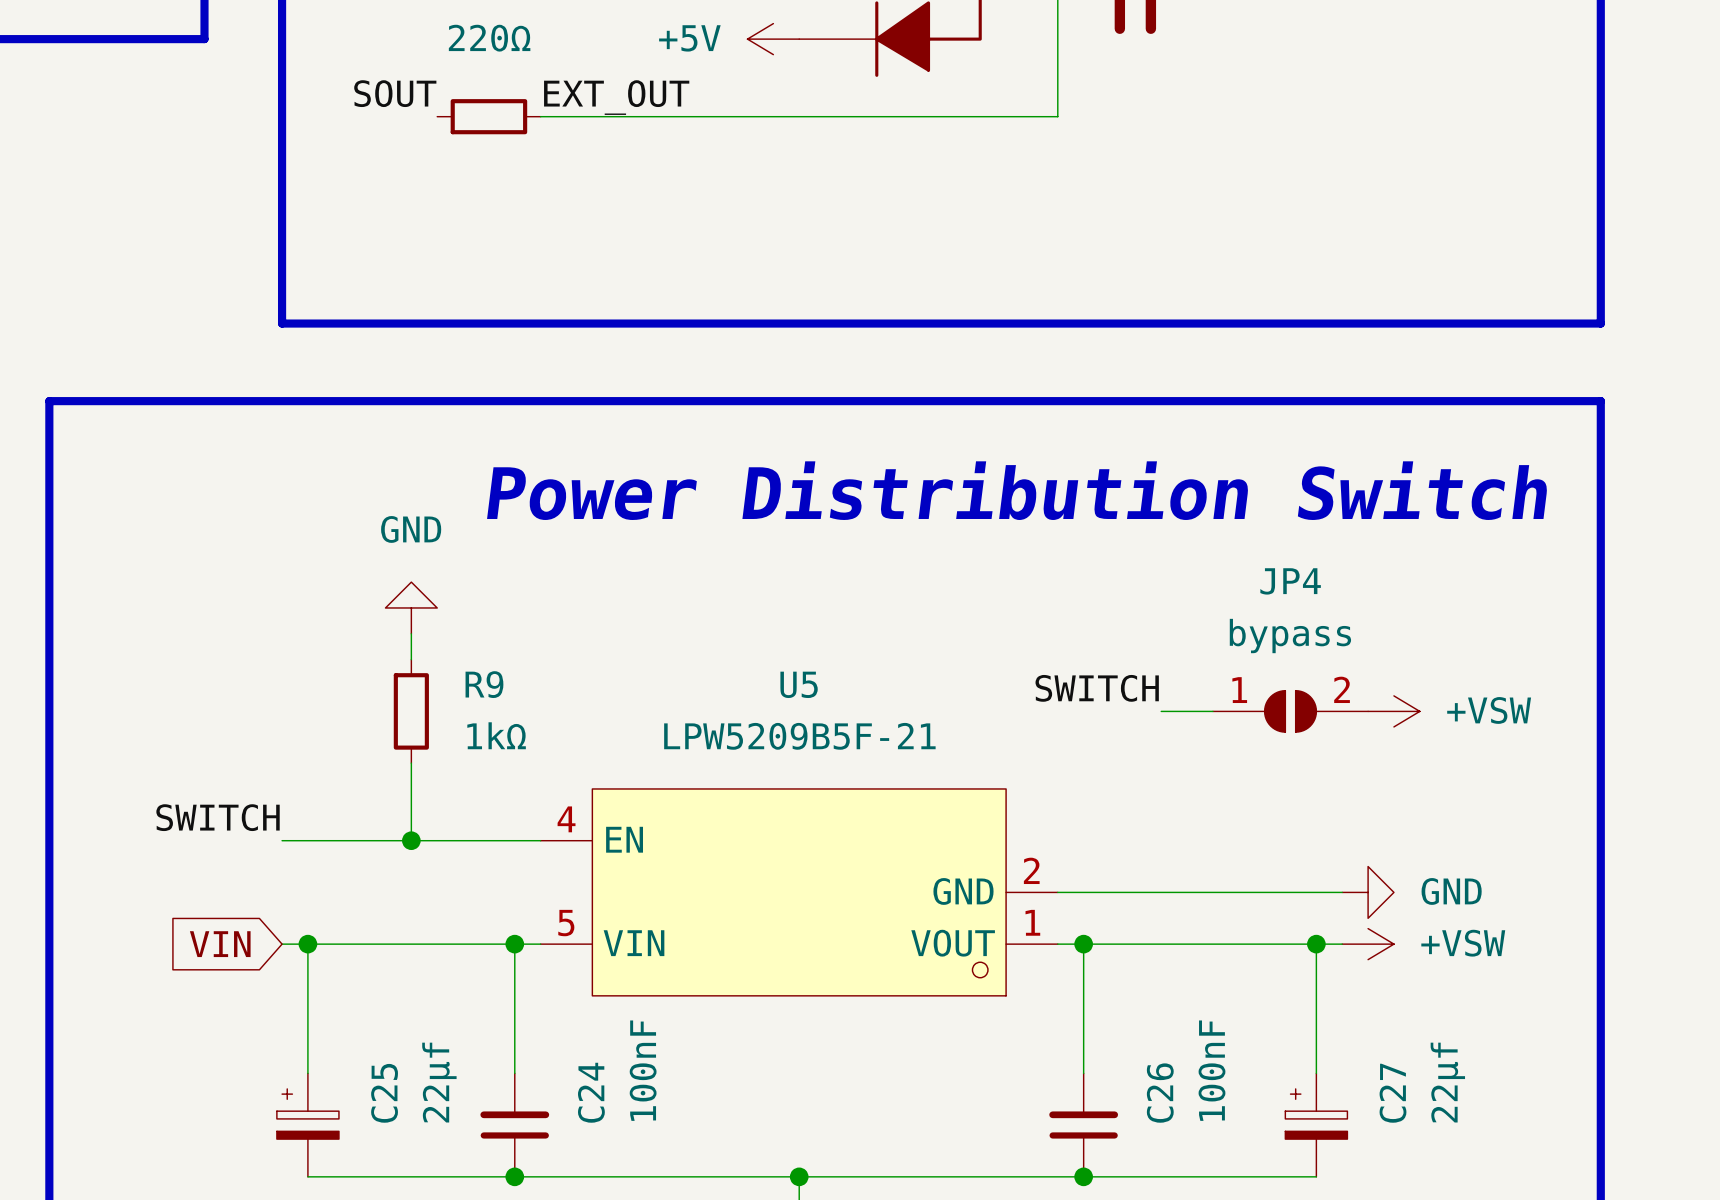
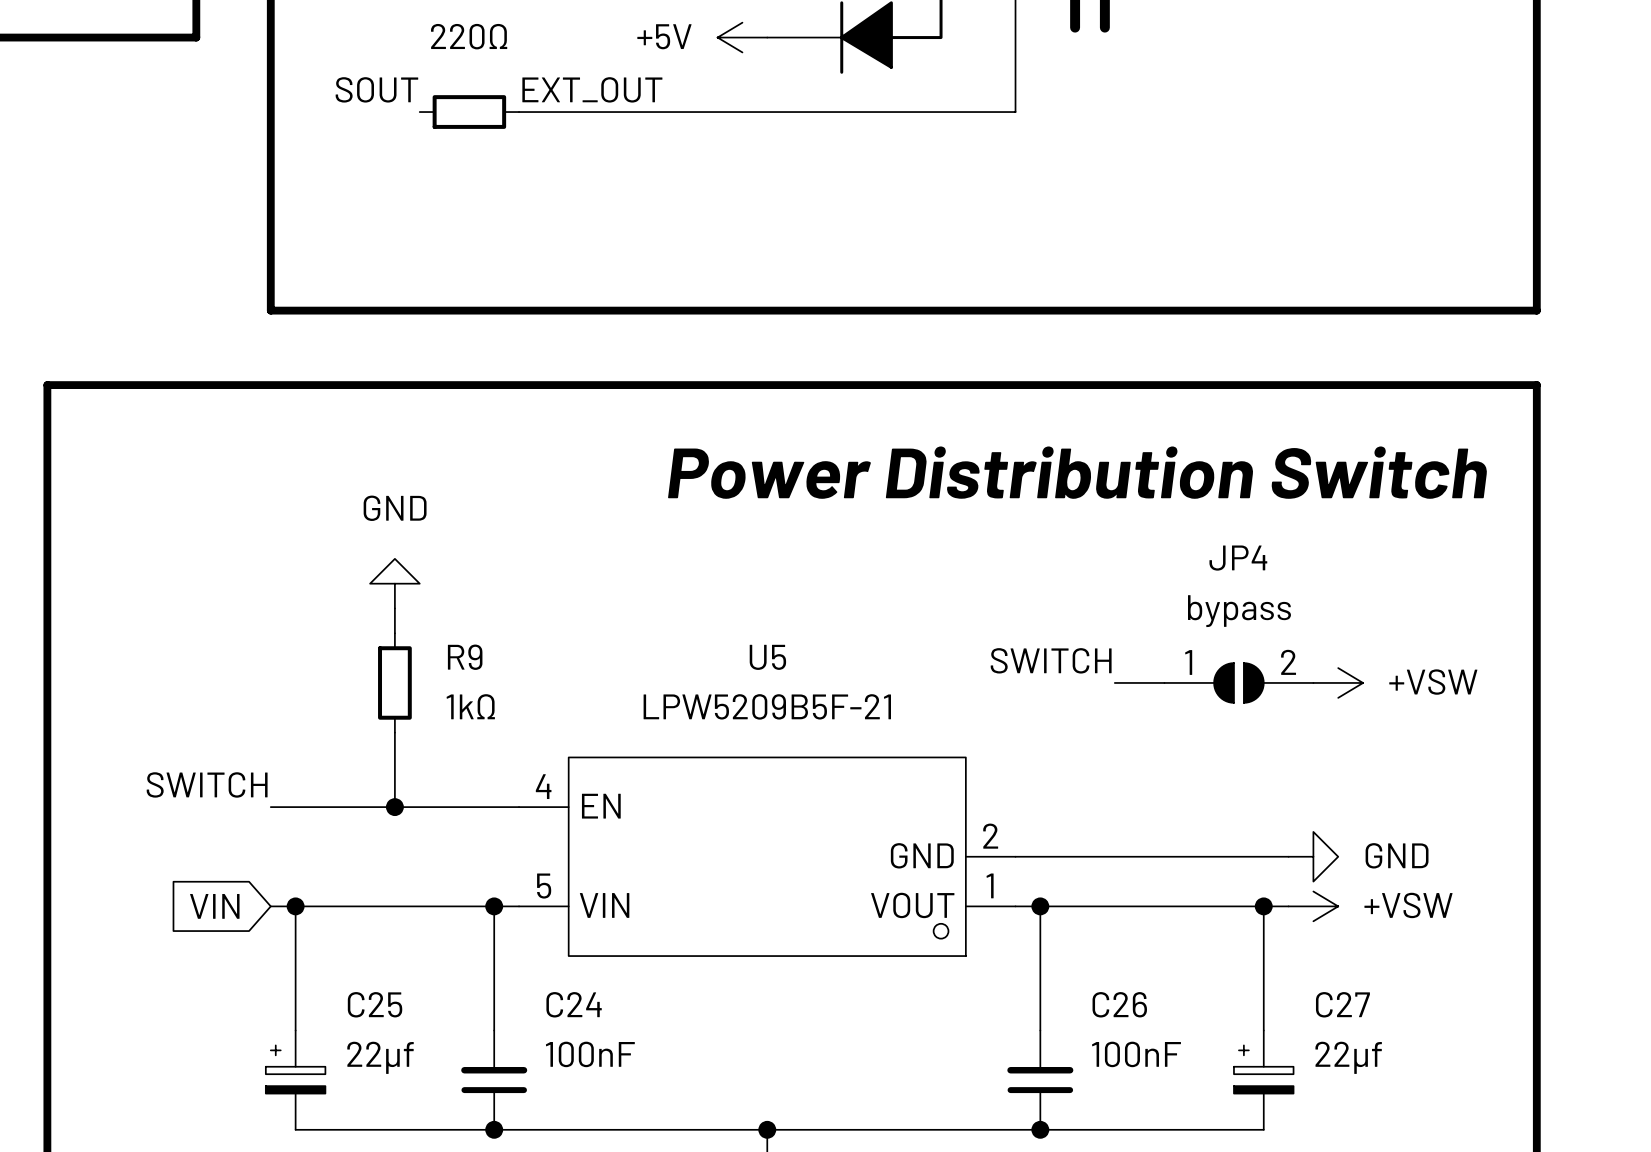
C24 value rotation: 0° (643, 1070) -> 90° clockwise (590, 1054)
C26 value rotation: 0° (1211, 1070) -> 90° clockwise (1136, 1054)
C25 value rotation: 0° (439, 1082) -> 90° clockwise (380, 1057)
C27 value rotation: 0° (1447, 1082) -> 90° clockwise (1348, 1057)
C24 name rotation: 0° (591, 1092) -> 90° clockwise (574, 1004)
C25 name rotation: 0° (384, 1093) -> 90° clockwise (375, 1004)
C26 name rotation: 0° (1160, 1093) -> 90° clockwise (1119, 1004)
C27 name rotation: 0° (1392, 1093) -> 90° clockwise (1342, 1004)

